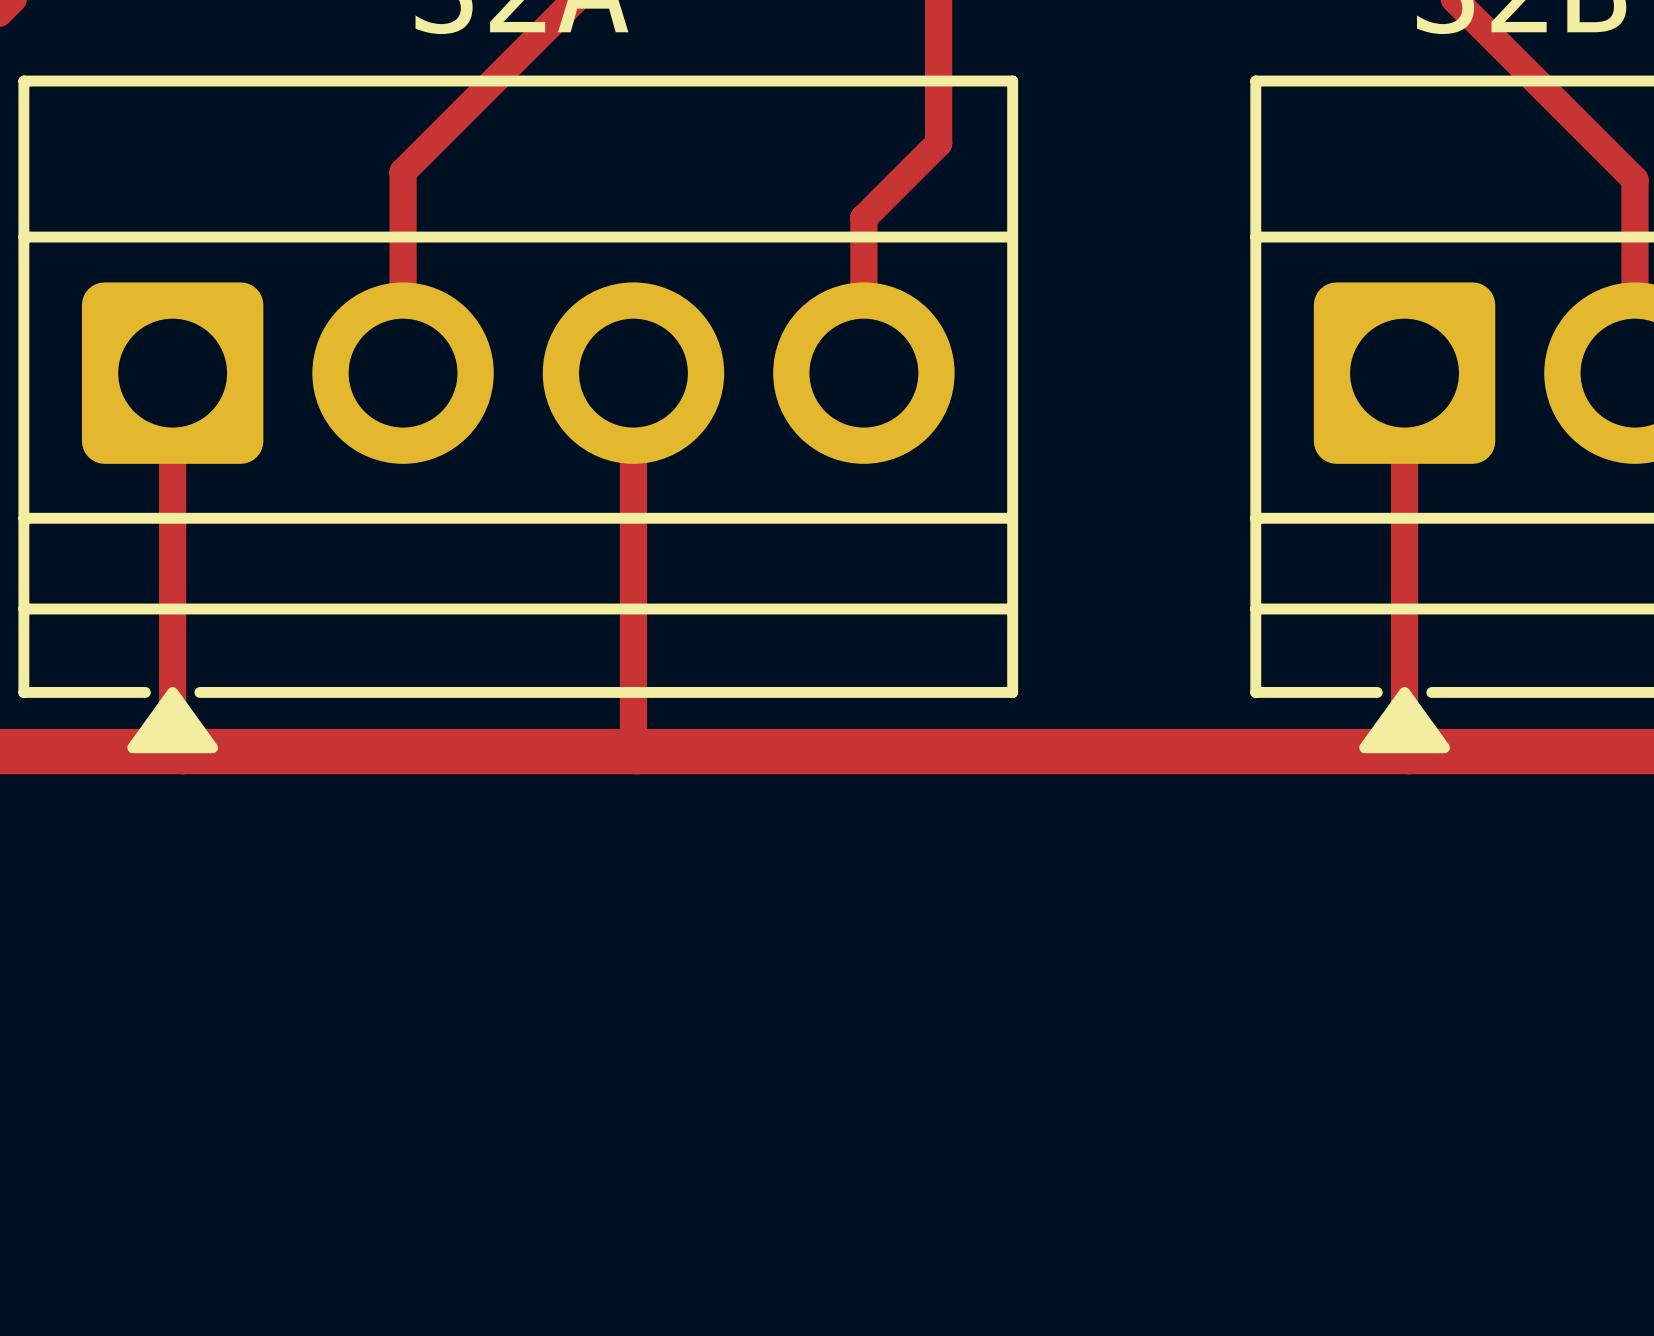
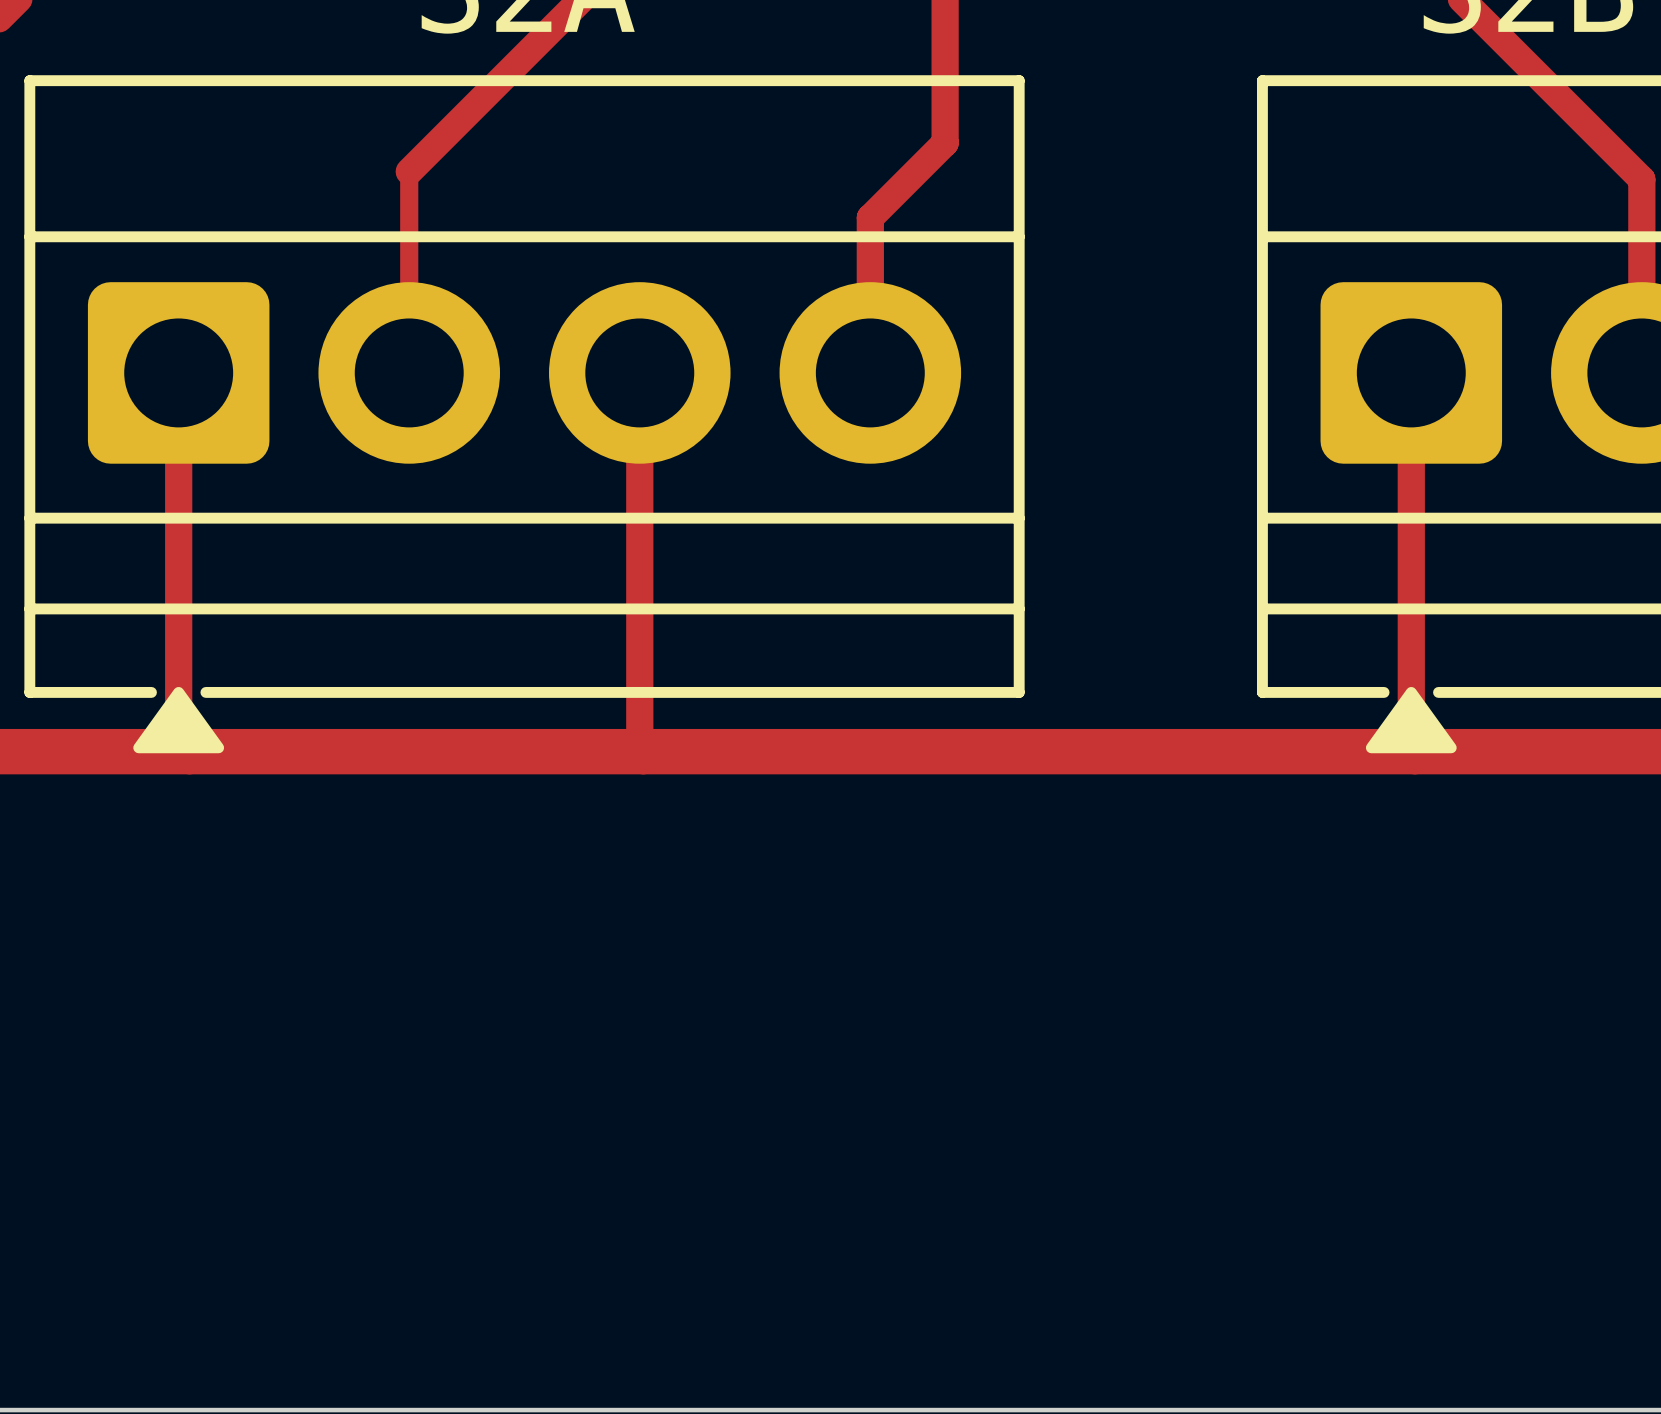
track width: thick (403, 171) (403, 373) -> thin (409, 171) (409, 372)

